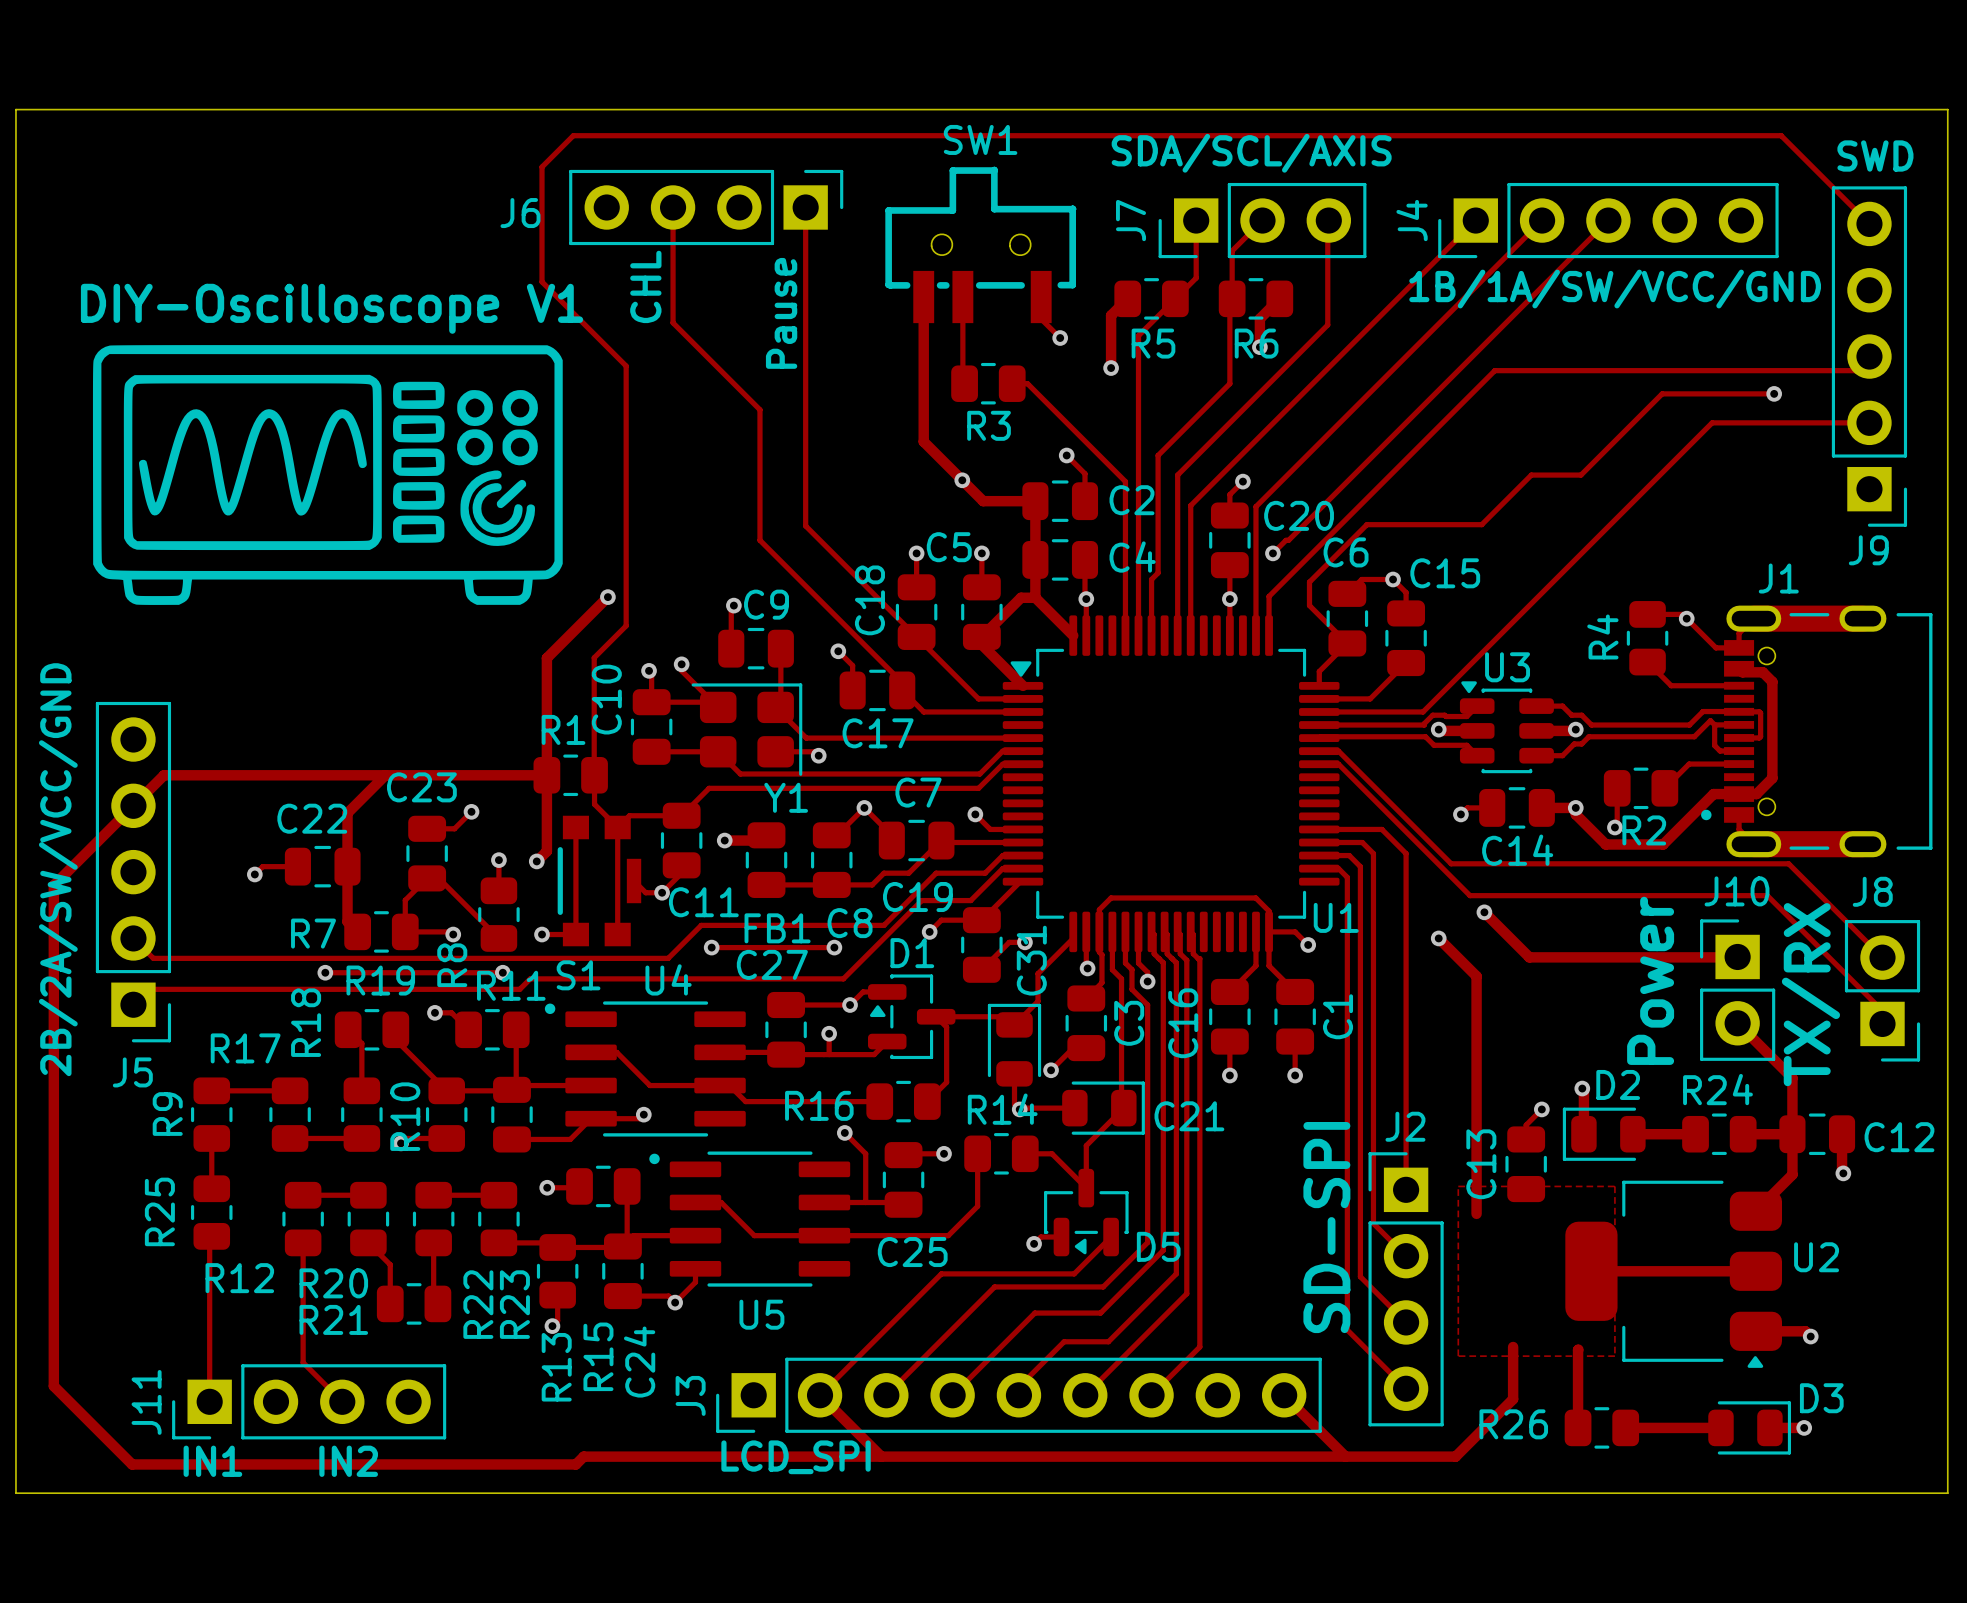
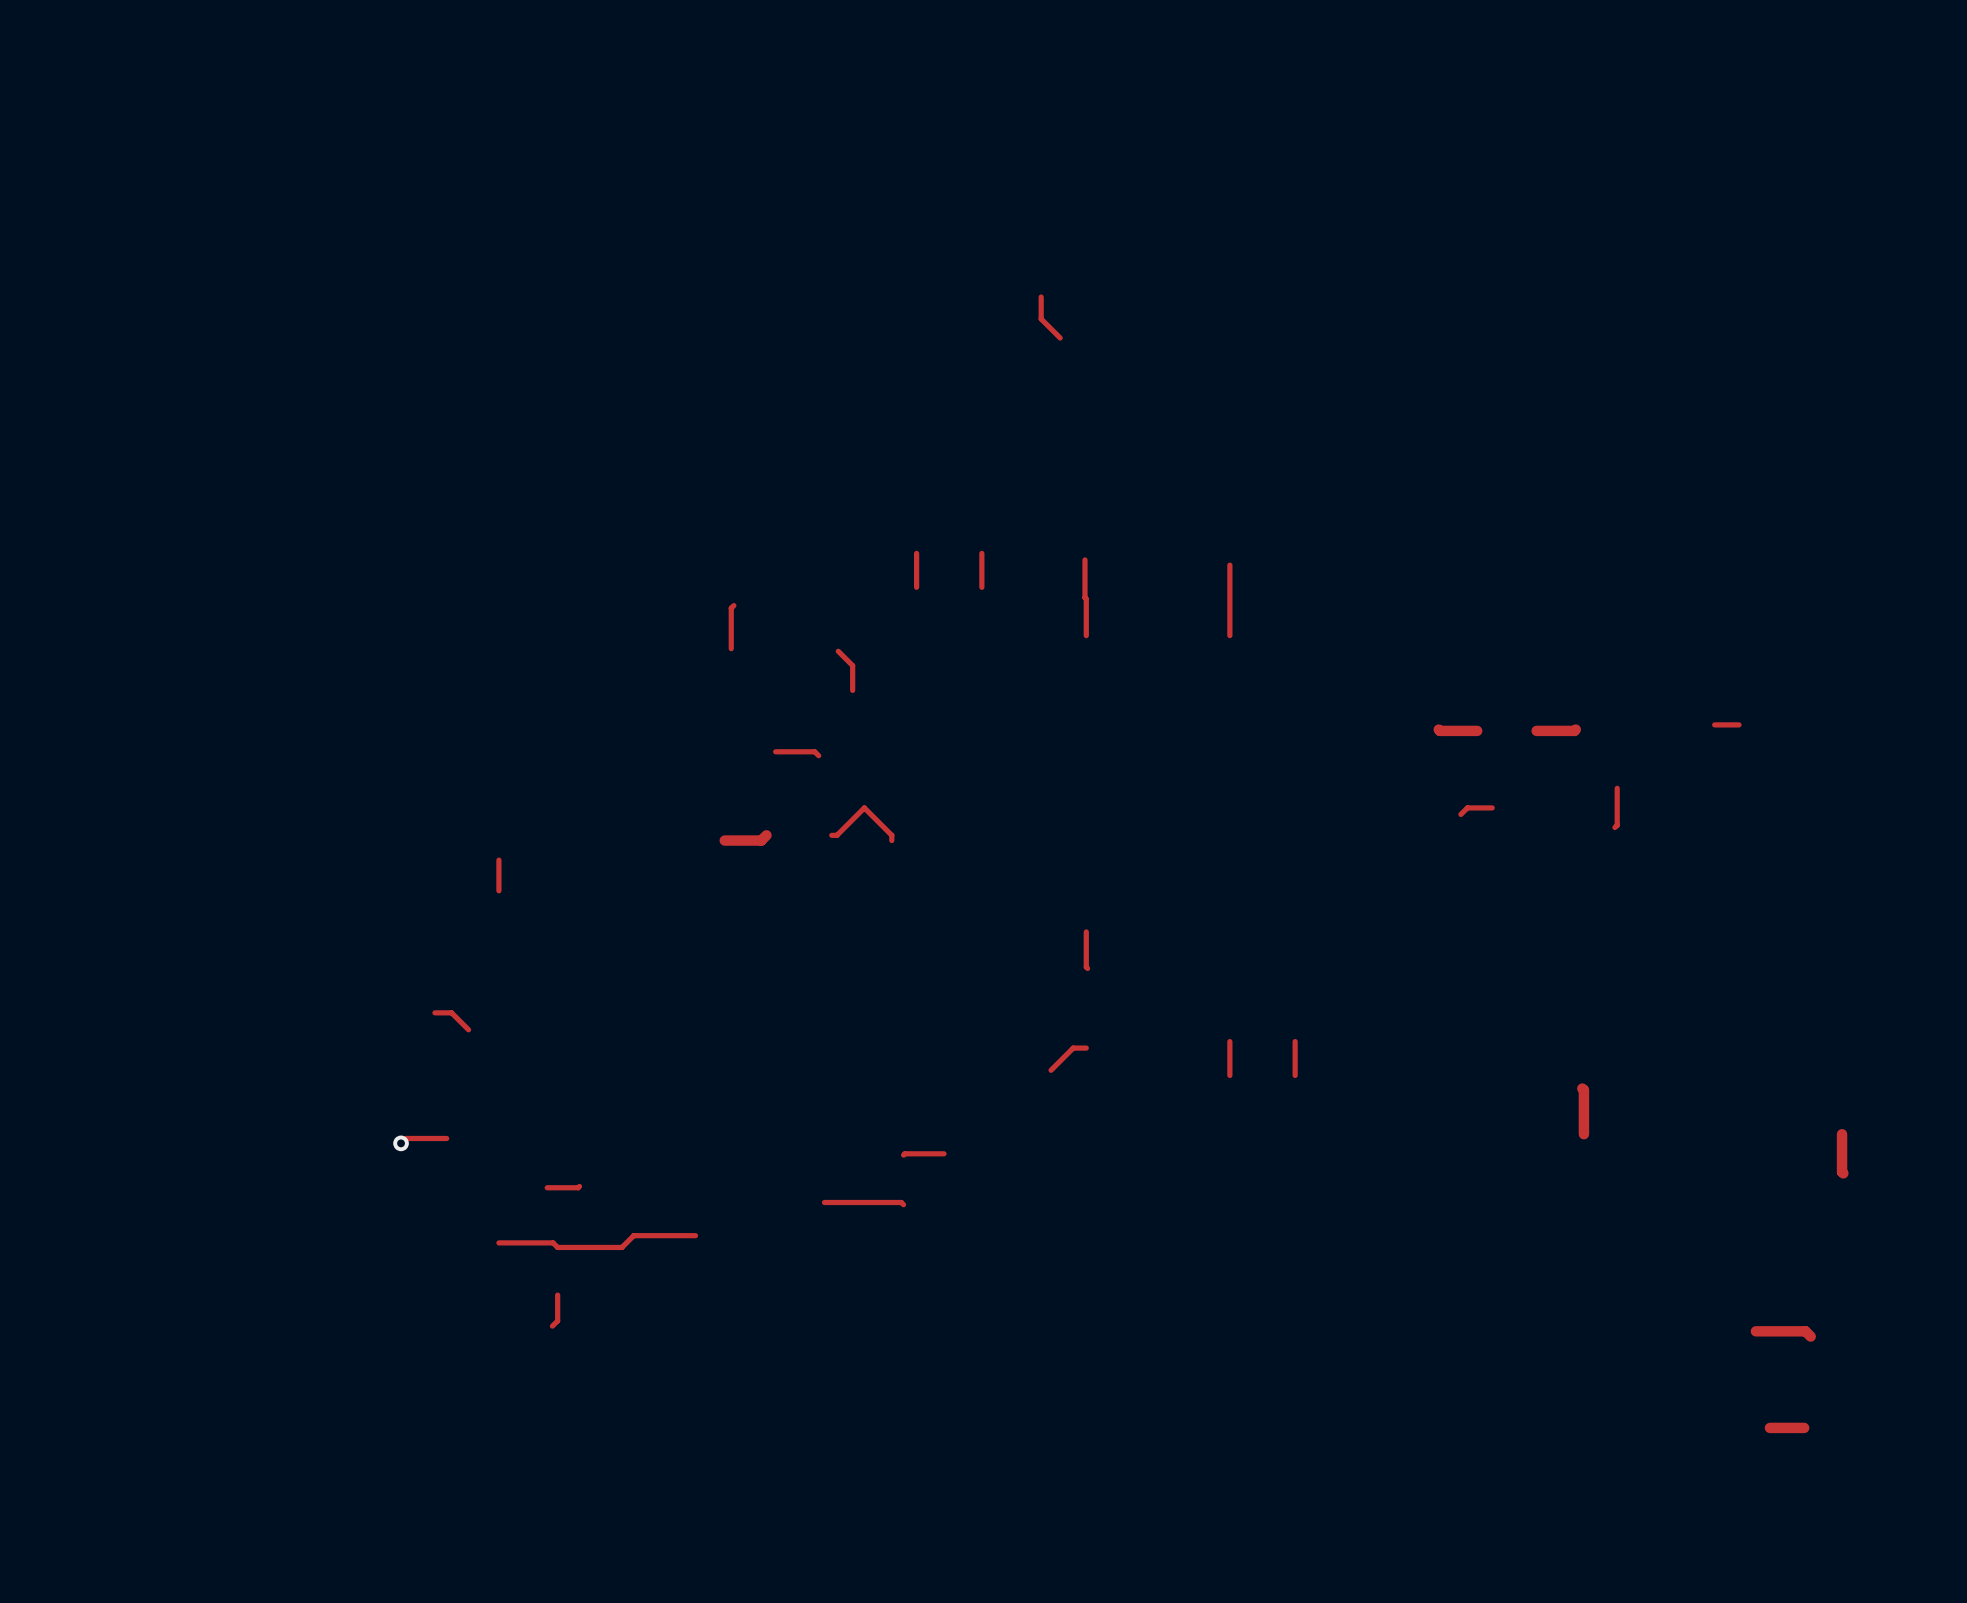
board edge: (15, 109) (1947, 109) (1947, 1493) (15, 1493) (15, 109) -> none
text: SDA/SCL/AXIS (1251, 153) -> none
text: SWD (1875, 156) -> none
track: (673, 207) (673, 322) (759, 409) (759, 540) (902, 682) (902, 690) (923, 711) (1022, 711) -> none
J6: (706, 207) -> none
track: (805, 207) (805, 525) (978, 698) (1022, 698) -> none
track: (1196, 220) (1196, 278) (1138, 335) (1138, 635) -> none
track: (1262, 220) (1232, 250) (1229, 383) (1158, 455) (1158, 572) (1151, 579) (1151, 635) -> none
J7: (1262, 220) -> none
track: (1328, 220) (1327, 324) (1177, 475) (1177, 635) -> none
track: (1475, 220) (1190, 505) (1190, 635) -> none
track: (1542, 220) (1255, 506) (1255, 635) -> none
track: (1608, 220) (1288, 540) (1286, 540) (1272, 553) -> none
J4: (1608, 220) -> none
track: (1869, 223) (1781, 135) (573, 135) (542, 167) (542, 281) (626, 366) (626, 625) (594, 657) (594, 774) -> none
SW1: (980, 244) -> none
text: CHL (645, 286) -> none
text: 1B/1A/SW/VCC/GND (1615, 289) -> none
track: (923, 297) (923, 441) (983, 501) (1035, 501) (1035, 597) -> none
track: (962, 297) (962, 382) (964, 383) -> none
track: (1127, 298) (1111, 315) (1111, 368) -> none
R5: (1151, 298) -> none
R6: (1255, 298) -> none
track: (1279, 298) (1259, 318) (1259, 347) -> none
text: DIY-Oscilloscope V1 (332, 308) -> none
text: Pause (781, 313) -> none
via: (1060, 338) -> none
drawing: [92, 345, 563, 605] -> none
via: (1259, 347) -> none
track: (1869, 356) (1855, 370) (1494, 370) (1269, 596) (1269, 635) -> none
J9: (1869, 356) -> none
via: (1111, 368) -> none
R3: (988, 383) -> none
track: (1012, 383) (1027, 383) (1125, 481) (1125, 635) -> none
track: (1774, 393) (1662, 393) (1580, 475) (1531, 475) (1481, 524) (1366, 524) (1309, 582) (1309, 605) (1347, 643) (1319, 671) (1319, 685) -> none
via: (1774, 393) -> none
track: (1869, 422) (1712, 422) (1423, 711) (1319, 711) -> none
track: (1066, 455) (1084, 473) (1084, 501) -> none
via: (1066, 455) -> none
via: (962, 480) -> none
track: (1242, 481) (1229, 494) (1229, 515) -> none
via: (1242, 481) -> none
C2: (1060, 501) -> none
C20: (1229, 540) -> none
via: (916, 553) -> none
via: (981, 553) -> none
via: (1272, 553) -> none
C4: (1060, 559) -> none
via: (1393, 579) -> none
track: (1347, 593) (1361, 579) (1393, 579) (1406, 592) (1406, 613) -> none
track: (607, 597) (546, 658) (546, 851) (536, 861) -> none
via: (607, 597) -> none
track: (1035, 597) (1073, 635) -> none
track: (1035, 597) (1021, 597) (981, 636) (981, 644) (1022, 685) -> none
via: (1086, 599) -> none
via: (1229, 599) -> none
via: (733, 605) -> none
C18: (916, 612) -> none
C5: (981, 612) -> none
track: (1647, 614) (1682, 614) (1715, 647) (1739, 647) (1739, 633) (1753, 618) (1862, 618) -> none
C6: (1347, 618) -> none
via: (1686, 618) -> none
C15: (1406, 638) -> none
R4: (1647, 638) -> none
C9: (756, 648) -> none
track: (780, 648) (780, 702) (775, 707) (806, 738) (1022, 738) -> none
via: (838, 651) -> none
track: (1647, 662) (1671, 685) (1739, 685) -> none
track: (1406, 663) (1370, 698) (1319, 698) -> none
track: (681, 664) (681, 670) (718, 707) -> none
via: (681, 664) -> none
track: (1739, 668) (1742, 672) (1762, 672) (1772, 681) (1772, 778) (1756, 794) (1713, 794) (1663, 844) (1605, 844) (1575, 814) (1575, 807) (1541, 807) -> none
track: (649, 670) (651, 673) (651, 702) (712, 702) -> none
via: (649, 670) -> none
C17: (877, 690) -> none
track: (1477, 706) (1466, 716) (1432, 715) (1424, 725) (1319, 725) -> none
track: (1536, 706) (1562, 706) (1571, 715) (1581, 715) (1591, 725) (1689, 725) (1703, 711) (1738, 711) -> none
track: (1739, 711) (1760, 713) (1760, 736) (1739, 737) -> none
C10: (651, 726) -> none
U3: (1506, 727) -> none
Y1: (746, 729) -> none
via: (1438, 729) -> none
via: (1575, 729) -> none
J1: (1816, 731) -> none
track: (1319, 738) (1425, 736) (1434, 745) (1466, 745) (1477, 755) -> none
track: (1022, 751) (1002, 751) (979, 774) (740, 774) (718, 751) (651, 751) -> none
track: (1319, 751) (1338, 751) (1451, 863) (1788, 863) (1882, 957) -> none
track: (1739, 751) (1720, 751) (1714, 745) (1714, 724) (1710, 720) (1694, 736) (1588, 736) (1581, 743) (1574, 743) (1562, 755) (1536, 755) -> none
via: (818, 755) -> none
track: (1022, 764) (1002, 764) (978, 788) (709, 788) (681, 815) (629, 815) (617, 827) -> none
track: (1319, 764) (1338, 764) (1470, 895) (1767, 895) (1882, 1010) (1882, 1023) -> none
track: (1739, 764) (1689, 764) (1664, 788) -> none
track: (385, 775) (347, 813) (347, 921) (357, 931) -> none
track: (546, 775) (163, 775) (53, 885) (53, 1386) (132, 1464) (575, 1464) (583, 1456) (1455, 1456) (1513, 1399) (1513, 1346) -> none
R1: (570, 775) -> none
track: (594, 775) (594, 804) (617, 827) -> none
U1: (1171, 783) -> none
R2: (1641, 788) -> none
via: (864, 807) -> none
C14: (1517, 807) -> none
via: (1575, 807) -> none
track: (471, 811) (454, 828) (427, 828) -> none
via: (471, 811) -> none
track: (975, 814) (990, 829) (1022, 829) -> none
via: (975, 814) -> none
via: (1460, 814) -> none
track: (1739, 814) (1739, 829) (1753, 844) (1862, 844) -> none
track: (575, 827) (575, 934) (542, 934) -> none
track: (617, 827) (617, 934) -> none
via: (1614, 827) -> none
track: (1319, 829) (1381, 829) (1406, 853) (1406, 1189) -> none
C11: (681, 840) -> none
via: (724, 840) -> none
C7: (916, 840) -> none
track: (1022, 842) (943, 842) (941, 840) (908, 873) (883, 873) (872, 884) (766, 884) -> none
track: (1319, 842) (1362, 842) (1373, 853) (1373, 1223) (1406, 1256) -> none
C23: (427, 853) -> none
track: (1022, 855) (1002, 855) (985, 873) (936, 873) (883, 925) (701, 925) (668, 958) (153, 958) (133, 938) -> none
track: (1319, 855) (1349, 855) (1360, 866) (1360, 1276) (1406, 1322) -> none
via: (498, 860) -> none
FB1: (766, 860) -> none
C8: (831, 860) -> none
via: (536, 861) -> none
track: (681, 865) (681, 873) (662, 892) (645, 892) (634, 881) -> none
track: (297, 866) (262, 866) (254, 874) -> none
C22: (322, 866) -> none
track: (1022, 868) (1002, 868) (970, 900) (921, 900) (843, 978) (530, 978) (519, 989) (148, 989) (133, 1004) -> none
track: (1319, 868) (1338, 868) (1347, 877) (1347, 1330) (1406, 1388) -> none
text: 2B/2A/SW/VCC/GND (58, 869) -> none
J5: (133, 872) -> none
via: (254, 874) -> none
S1: (599, 881) -> none
track: (1022, 881) (1020, 881) (981, 920) (941, 920) (929, 931) -> none
via: (662, 892) -> none
track: (1484, 912) (1529, 957) (1737, 956) -> none
via: (1484, 912) -> none
R8: (498, 914) -> none
R7: (381, 931) -> none
via: (929, 931) -> none
track: (1073, 931) (1073, 938) (1038, 973) (1038, 1001) (1014, 1024) (1006, 1016) (936, 1016) (946, 1027) (946, 1082) (927, 1101) -> none
track: (1112, 931) (1112, 969) (1121, 978) (1121, 1105) (1123, 1108) (1086, 1145) (1086, 1188) (1052, 1153) (1025, 1153) -> none
track: (1125, 931) (1125, 963) (1131, 969) (1131, 989) (1147, 1005) (1147, 1242) (1103, 1286) (994, 1286) (886, 1395) -> none
track: (1138, 931) (1138, 963) (1147, 972) (1147, 981) -> none
track: (1151, 931) (1154, 934) (1154, 953) (1163, 962) (1163, 1250) (1100, 1313) (1034, 1313) (952, 1395) -> none
track: (1164, 931) (1167, 934) (1167, 953) (1176, 962) (1176, 1273) (1108, 1341) (1064, 1341) (1018, 1386) (1018, 1395) -> none
track: (1177, 931) (1180, 934) (1180, 953) (1186, 960) (1186, 1293) (1085, 1395) -> none
track: (1190, 931) (1193, 934) (1193, 953) (1199, 958) (1199, 1346) (1151, 1395) -> none
track: (1255, 931) (1255, 965) (1229, 991) -> none
track: (1269, 931) (1295, 931) (1308, 944) -> none
track: (453, 934) (450, 931) (405, 931) (405, 900) (427, 878) (438, 878) (498, 938) -> none
via: (453, 934) -> none
via: (542, 934) -> none
track: (1438, 938) (1476, 976) (1476, 1213) -> none
via: (1438, 938) -> none
track: (1024, 942) (1009, 942) (981, 969) -> none
via: (1024, 942) -> none
C19: (981, 944) -> none
via: (1308, 944) -> none
track: (711, 947) (834, 947) -> none
via: (711, 947) -> none
via: (834, 947) -> none
via: (1087, 968) -> none
track: (325, 972) (502, 972) -> none
via: (325, 972) -> none
via: (502, 972) -> none
text: Power (1650, 980) -> none
via: (1147, 981) -> none
J10: (1737, 990) -> none
J8: (1882, 990) -> none
track: (887, 991) (863, 991) (850, 1005) (786, 1005) -> none
track: (1295, 991) (1269, 965) (1269, 911) (1255, 897) (1111, 897) (1099, 909) (1099, 952) (1101, 954) (1101, 982) (1086, 998) -> none
text: TX/RX (1810, 994) -> none
via: (850, 1005) -> none
via: (434, 1012) -> none
D1: (911, 1016) -> none
C16: (1229, 1016) -> none
C1: (1295, 1016) -> none
C3: (1086, 1023) -> none
track: (1737, 1023) (1792, 1078) (1792, 1174) (1755, 1211) -> none
track: (348, 1029) (361, 1043) (361, 1090) -> none
R19: (371, 1029) -> none
track: (395, 1029) (395, 1039) (446, 1090) (511, 1090) (516, 1085) (516, 1029) -> none
R11: (492, 1029) -> none
C27: (786, 1029) -> none
track: (829, 1033) (829, 1054) -> none
via: (829, 1033) -> none
track: (887, 1041) (874, 1054) (720, 1052) -> none
C31: (1014, 1045) -> none
track: (591, 1052) (616, 1052) (649, 1085) (729, 1085) (745, 1101) (879, 1101) -> none
U4: (645, 1068) -> none
via: (1051, 1070) -> none
track: (1014, 1073) (1014, 1104) (1019, 1109) (1074, 1108) -> none
via: (1229, 1075) -> none
via: (1295, 1075) -> none
track: (591, 1085) (521, 1085) (517, 1089) (511, 1089) -> none
via: (1582, 1088) -> none
track: (211, 1090) (290, 1090) -> none
R16: (903, 1101) -> none
C21: (1103, 1108) -> none
via: (1019, 1109) -> none
track: (1541, 1109) (1526, 1125) (1526, 1139) -> none
via: (1541, 1109) -> none
R9: (211, 1114) -> none
R17: (290, 1114) -> none
R18: (361, 1114) -> none
R10: (446, 1114) -> none
part: (511, 1114) -> none
track: (643, 1114) (639, 1118) (591, 1118) (570, 1139) (511, 1139) -> none
via: (643, 1114) -> none
track: (844, 1132) (865, 1153) (865, 1202) -> none
via: (844, 1132) -> none
D2: (1604, 1134) -> none
track: (1632, 1134) (1695, 1134) -> none
R24: (1719, 1134) -> none
track: (1743, 1134) (1792, 1134) -> none
C12: (1817, 1134) -> none
track: (211, 1138) (211, 1188) -> none
track: (290, 1138) (361, 1138) -> none
via: (944, 1153) -> none
track: (977, 1153) (977, 1206) (948, 1235) (754, 1235) (721, 1202) (695, 1202) -> none
R14: (1001, 1153) -> none
C13: (1526, 1164) -> none
via: (1843, 1173) -> none
C25: (903, 1179) -> none
R15: (603, 1186) -> none
track: (627, 1186) (627, 1242) -> none
zone outline: (1458, 1186) (1458, 1356) (1614, 1356) (1614, 1186) (1458, 1186) -> none
via: (547, 1187) -> none
track: (303, 1195) (368, 1195) -> none
track: (433, 1195) (498, 1195) -> none
R25: (211, 1212) -> none
D5: (1086, 1212) -> none
R12: (303, 1219) -> none
R20: (368, 1219) -> none
R22: (433, 1219) -> none
R23: (498, 1219) -> none
U5: (749, 1219) -> none
text: SD-SPI (1326, 1227) -> none
track: (211, 1236) (209, 1238) (209, 1401) -> none
track: (1061, 1237) (1040, 1237) (1034, 1243) -> none
track: (1111, 1237) (1074, 1273) (941, 1273) (820, 1395) (881, 1456) -> none
track: (303, 1242) (303, 1362) (342, 1401) -> none
track: (368, 1242) (390, 1264) (390, 1303) -> none
track: (433, 1242) (433, 1299) (437, 1303) -> none
via: (1034, 1243) -> none
track: (695, 1268) (695, 1282) (675, 1302) (668, 1296) (622, 1296) -> none
R13: (557, 1271) -> none
C24: (622, 1271) -> none
track: (1591, 1271) (1755, 1271) -> none
U2: (1673, 1274) -> none
J2: (1406, 1289) -> none
via: (675, 1302) -> none
R21: (414, 1303) -> none
via: (552, 1326) -> none
via: (1810, 1336) -> none
track: (1578, 1349) (1578, 1427) -> none
track: (1288, 1390) (1284, 1395) (1345, 1456) -> none
J3: (1018, 1395) -> none
J11: (309, 1401) -> none
R26: (1601, 1427) -> none
track: (1625, 1427) (1720, 1427) -> none
D3: (1749, 1427) -> none
via: (1804, 1427) -> none
text: LCD_SPI (796, 1457) -> none
text: IN1 (212, 1461) -> none
text: IN2 (348, 1461) -> none

